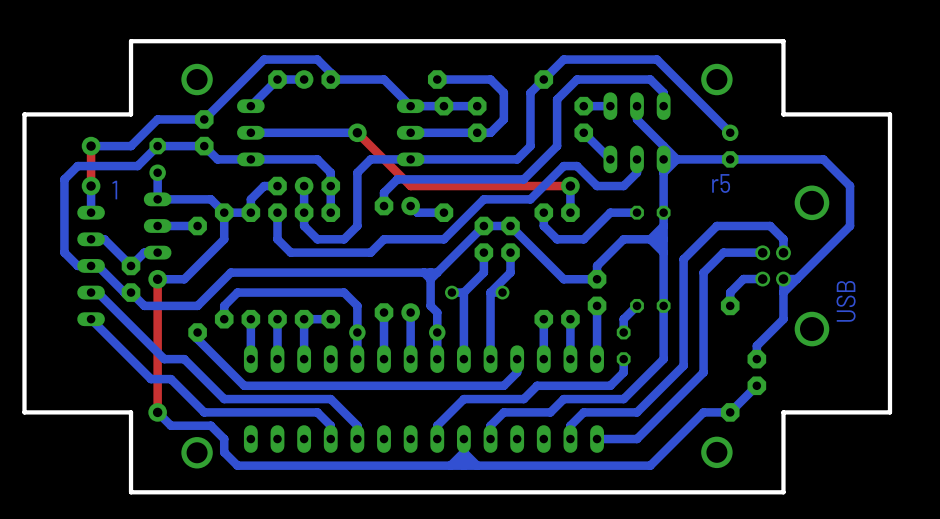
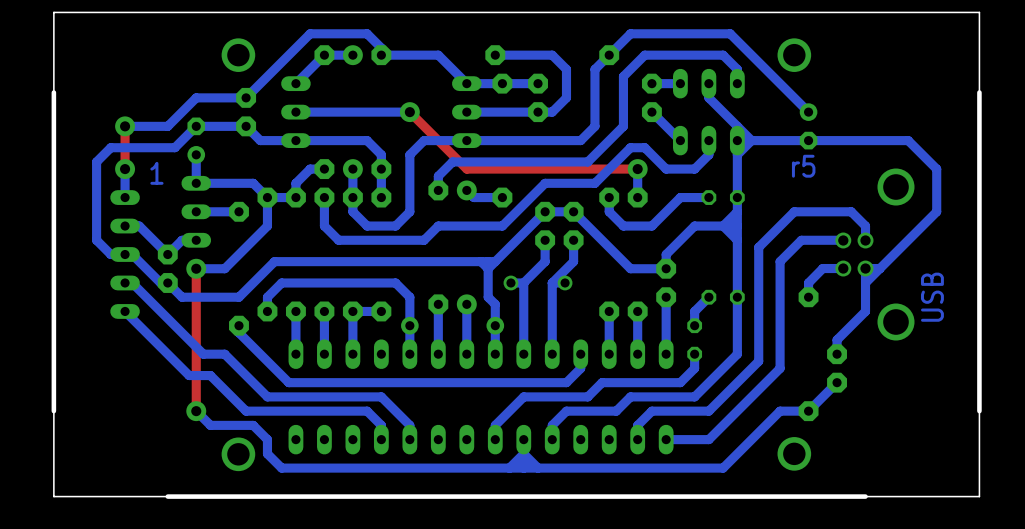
board edge: (889, 114) (783, 114) (783, 41) (131, 41) (131, 114) (24, 114) -> (979, 92) (979, 12) (53, 12) (53, 92)
board edge: (24, 412) (131, 412) (131, 492) -> (53, 411) (53, 496) (167, 496)
board edge: (889, 412) (783, 412) (783, 492) -> (979, 411) (979, 496) (865, 496)

